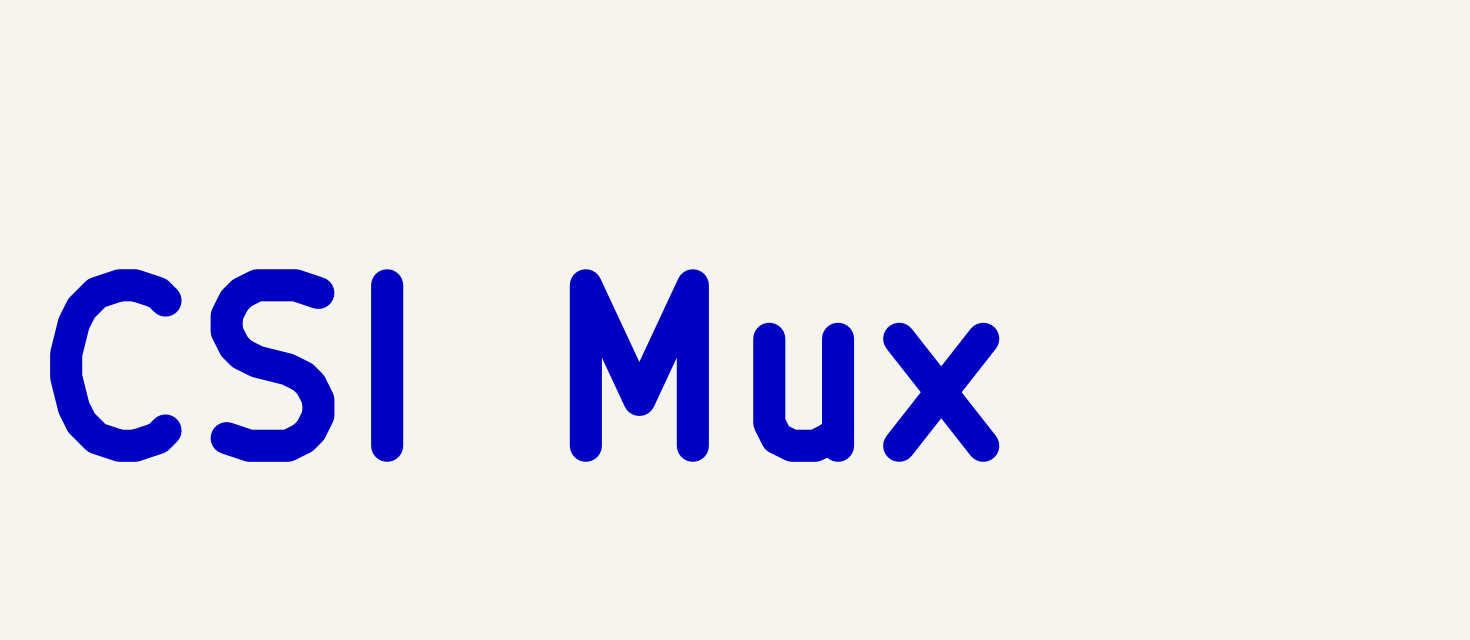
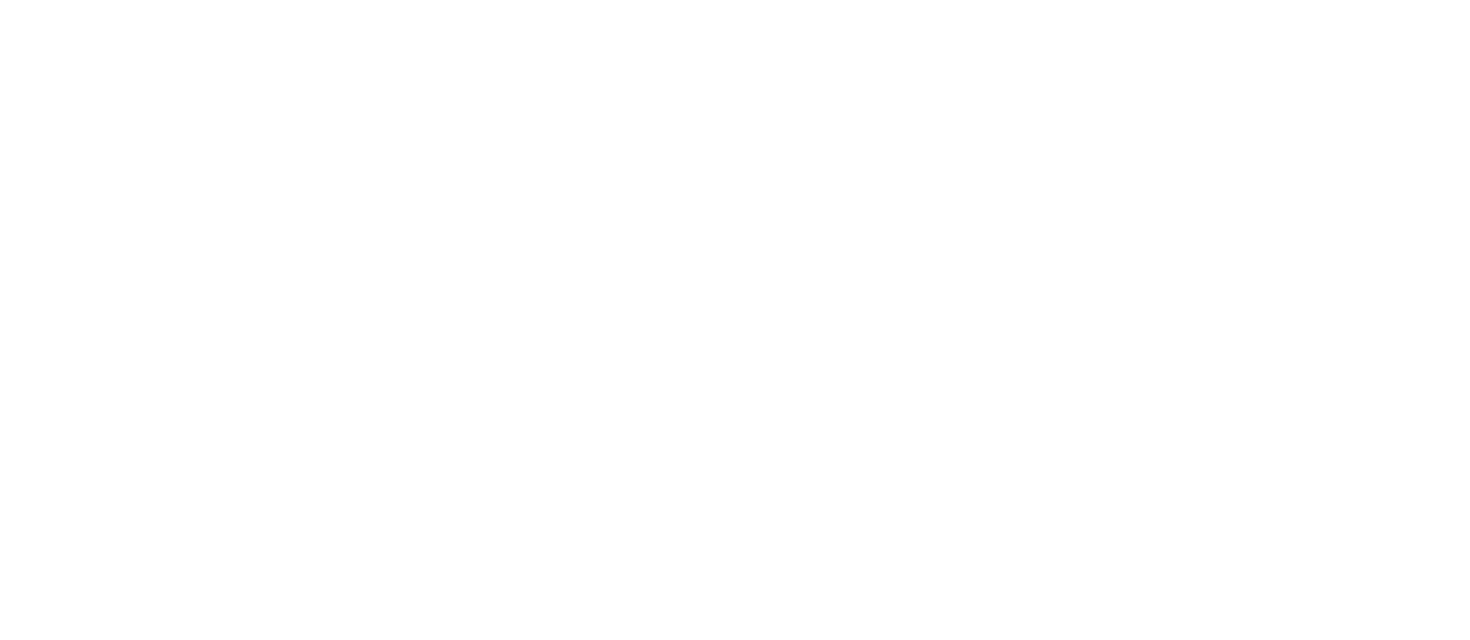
text: CSI Mux (524, 365) -> none

